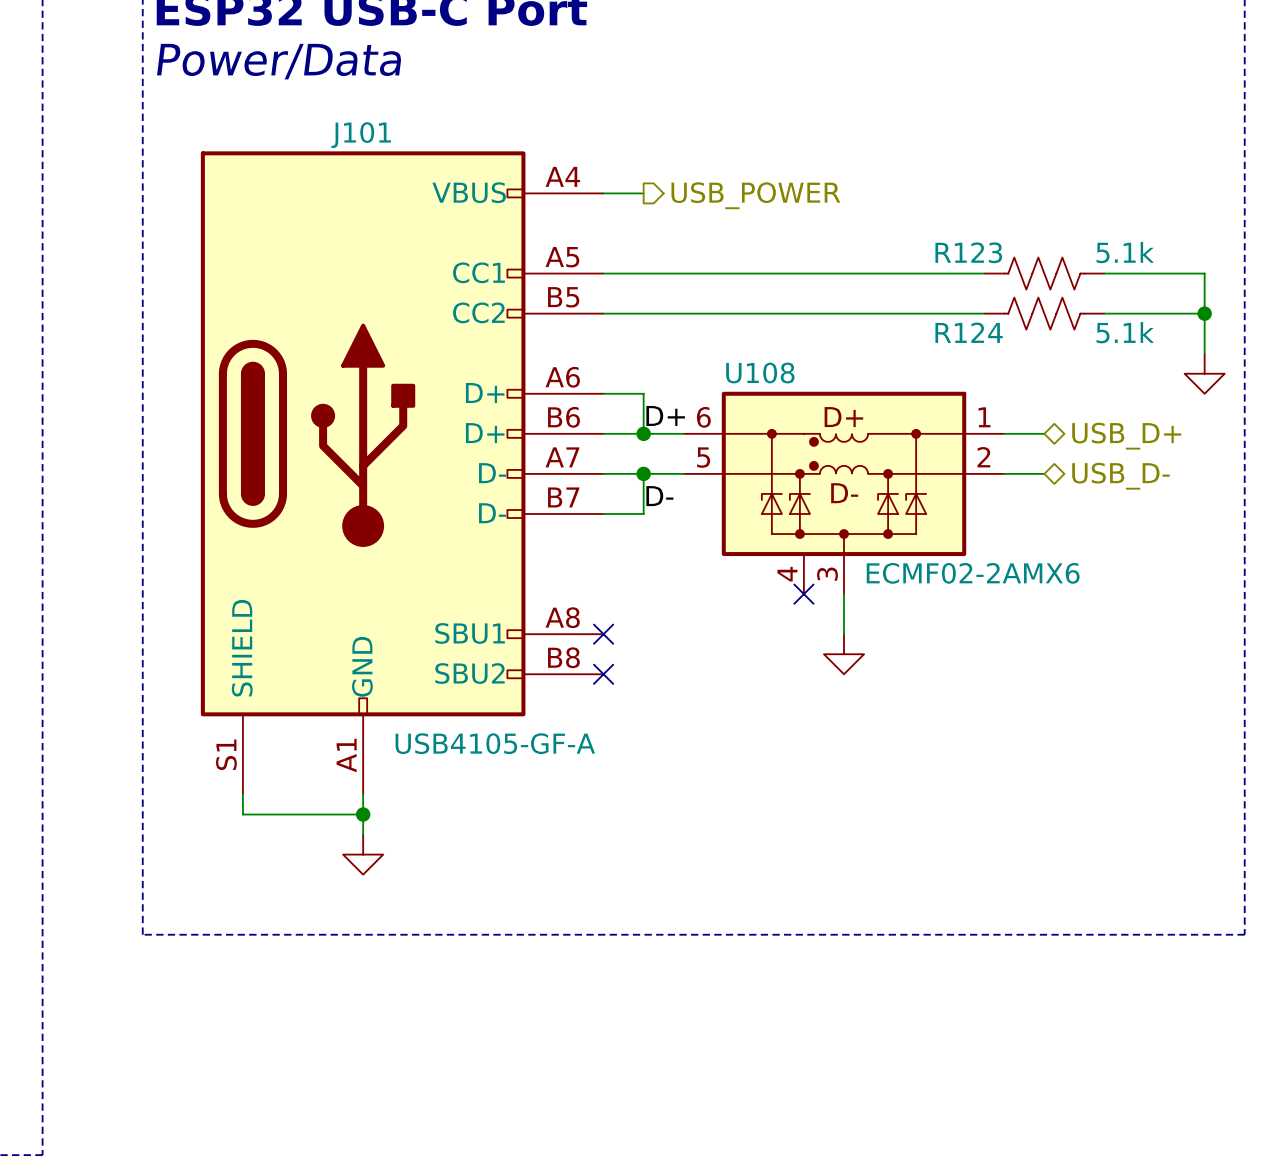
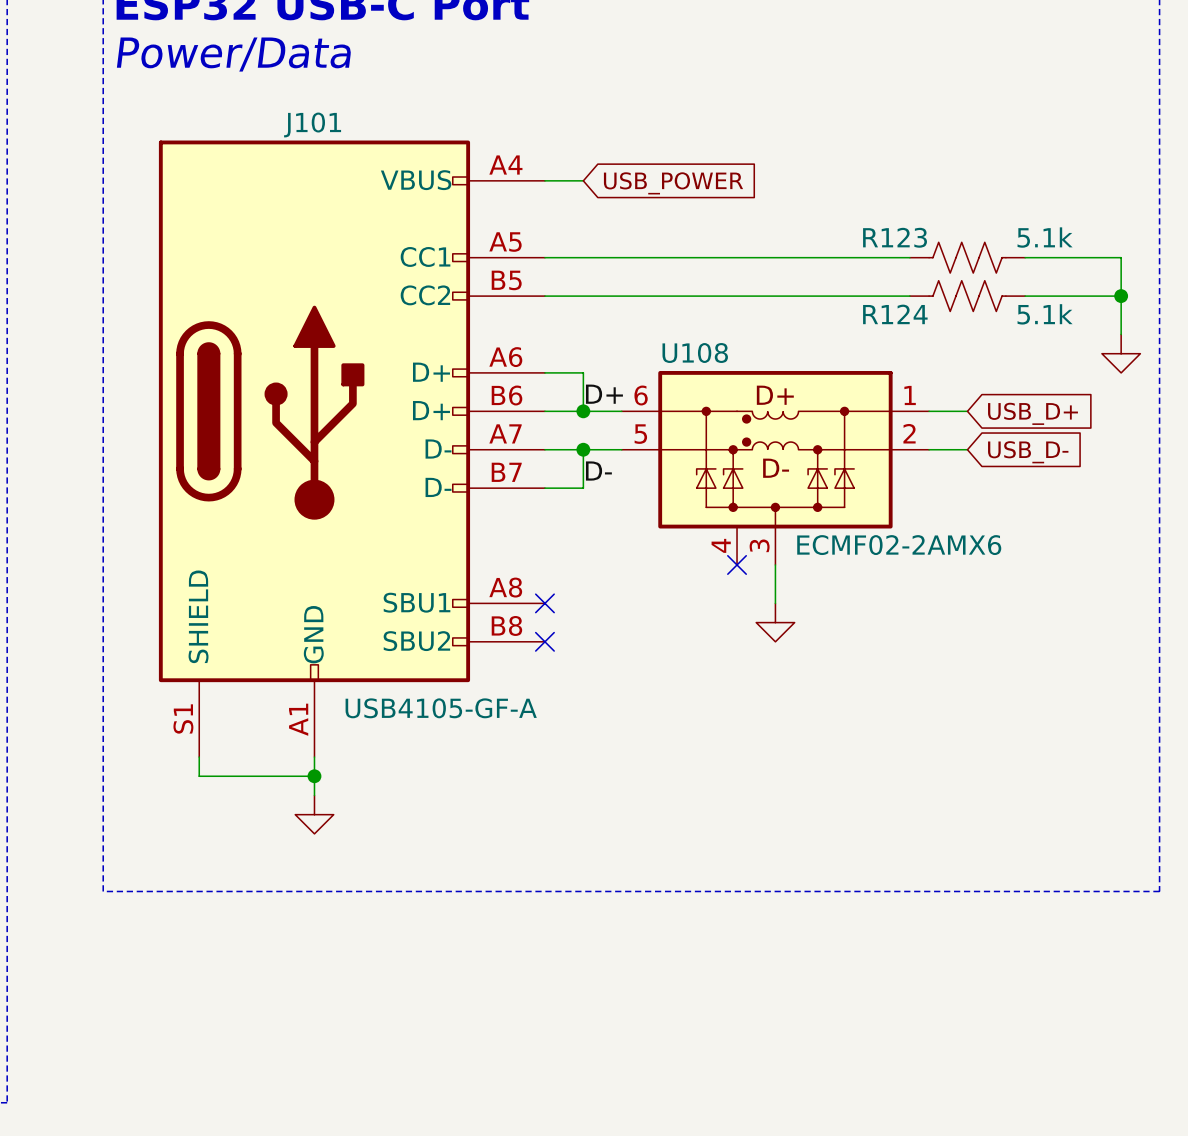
hierarchical label: USB_POWER (755, 195) -> none
global label: none -> USB_POWER (673, 183)
global label: none -> USB_D+ (1032, 413)
hierarchical label: USB_D+ (1126, 436) -> none
global label: none -> USB_D- (1028, 452)
hierarchical label: USB_D- (1120, 476) -> none

